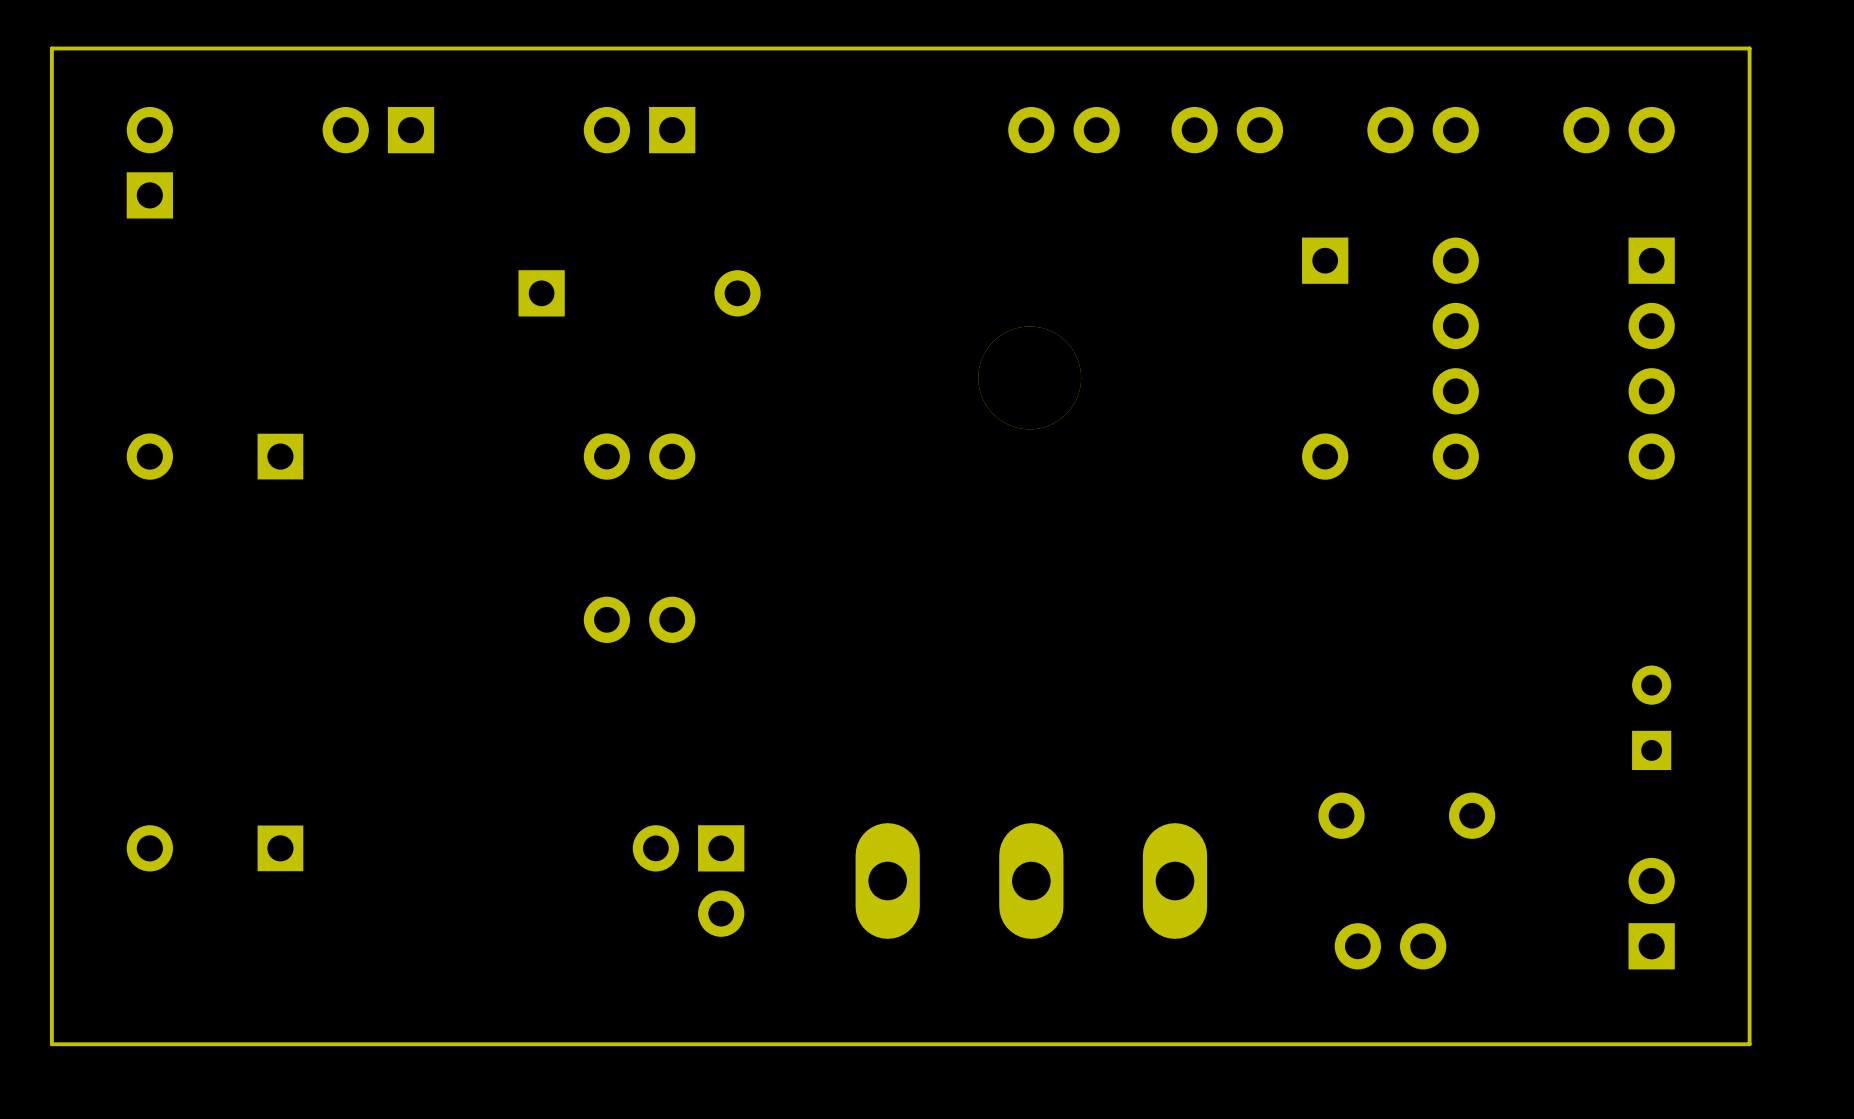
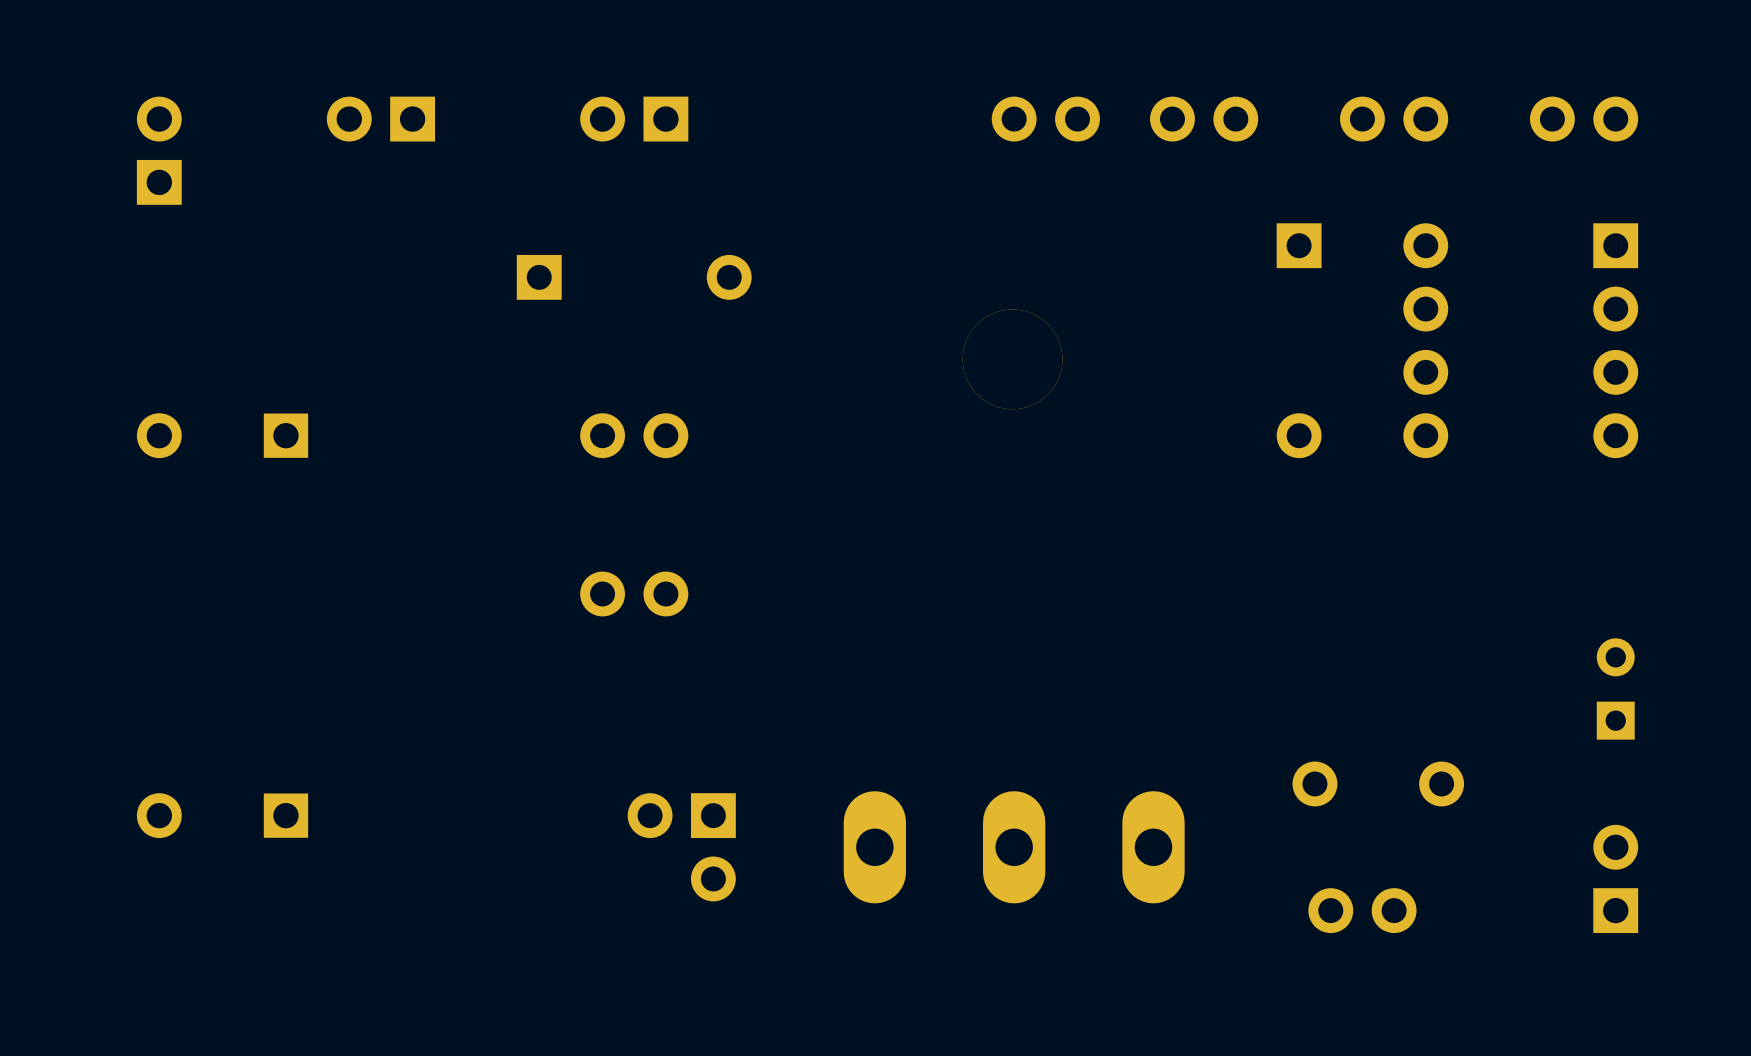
board edge: (1749, 48) (1749, 1044) (51, 1044) (51, 48) (1749, 48) -> none

